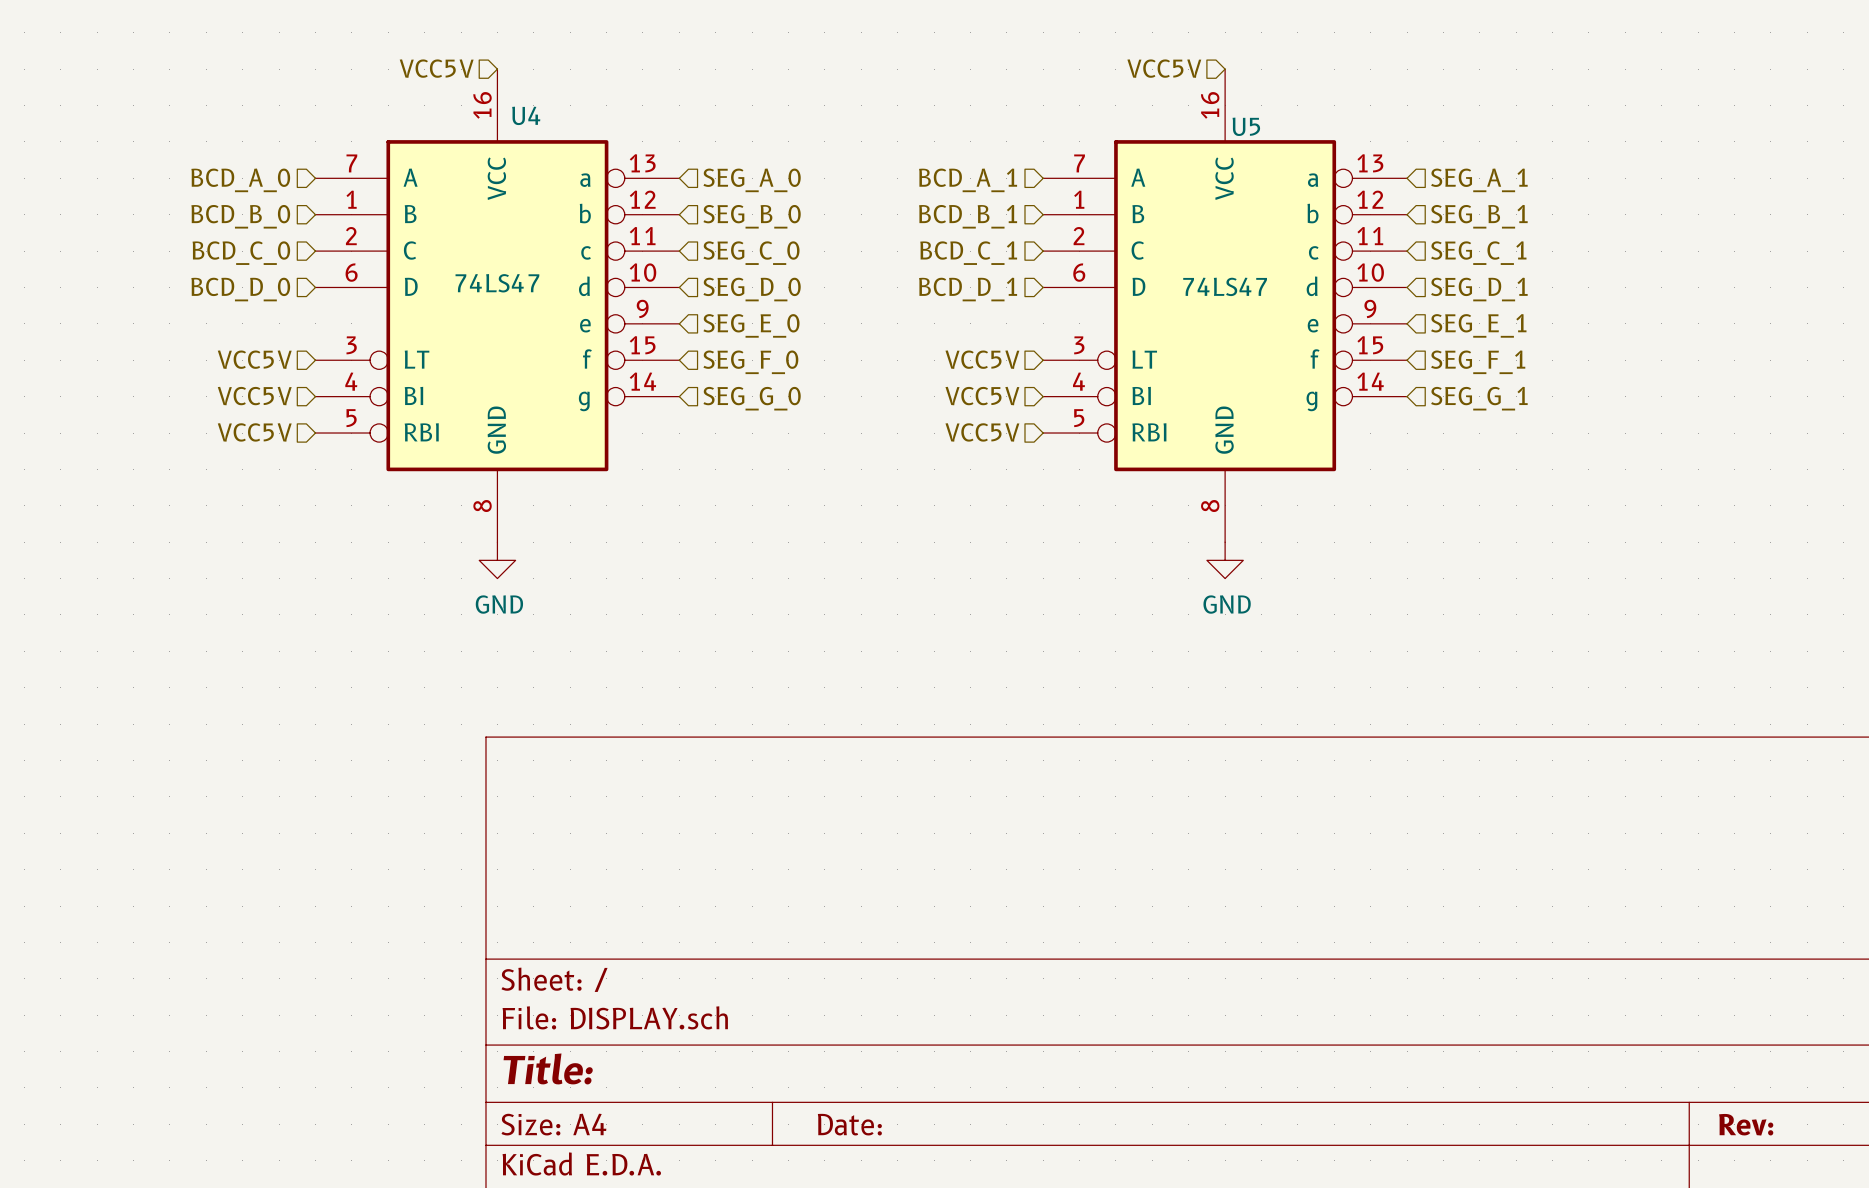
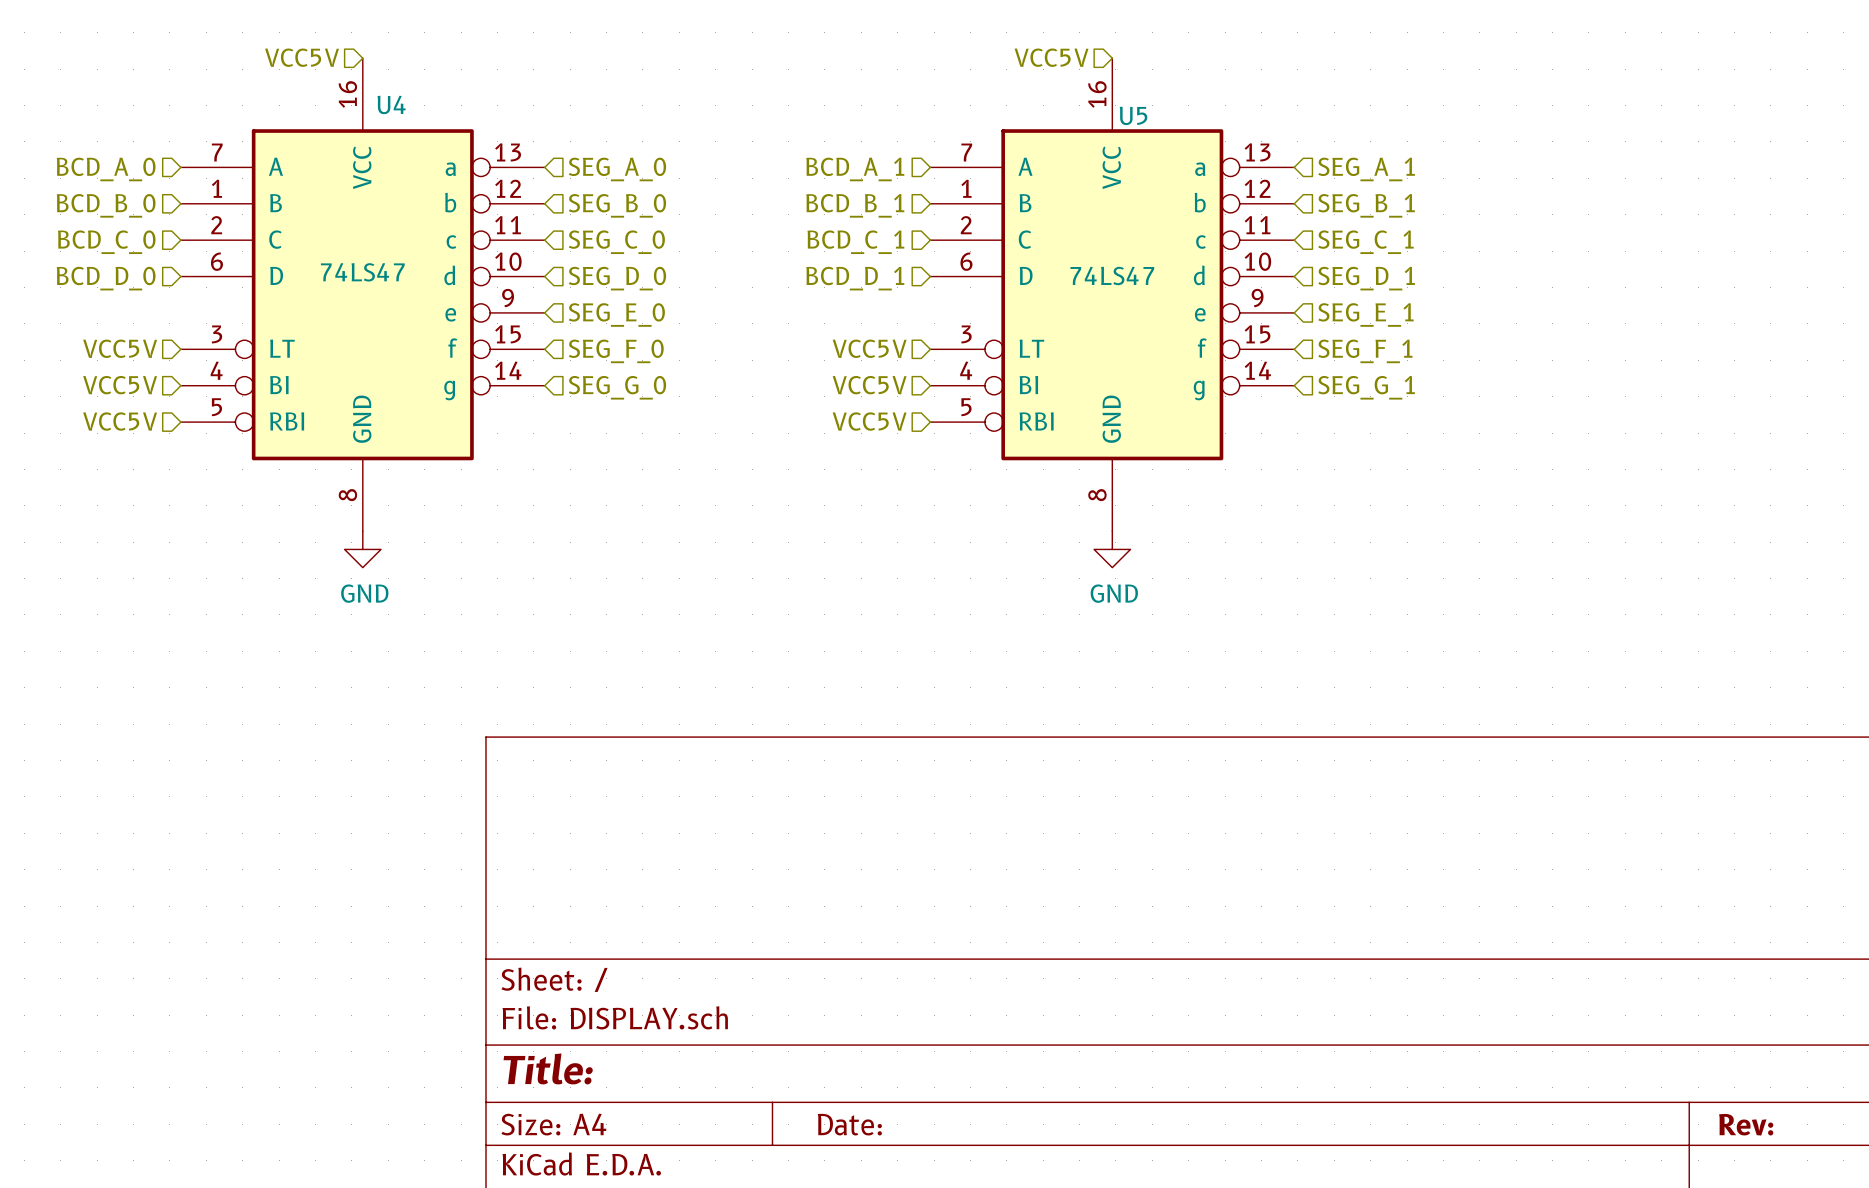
hierarchical label position: VCC5V (436, 68) -> VCC5V (302, 57)
hierarchical label position: VCC5V (1164, 68) -> VCC5V (1051, 57)
hierarchical label position: BCD_A_0 (240, 180) -> BCD_A_0 (106, 169)
hierarchical label position: SEG_A_0 (752, 180) -> SEG_A_0 (617, 169)
hierarchical label position: BCD_A_1 (968, 180) -> BCD_A_1 (855, 169)
hierarchical label position: SEG_A_1 (1479, 180) -> SEG_A_1 (1366, 169)
hierarchical label position: BCD_B_0 (240, 216) -> BCD_B_0 (106, 205)
hierarchical label position: SEG_B_0 (752, 216) -> SEG_B_0 (617, 205)
hierarchical label position: BCD_B_1 (968, 216) -> BCD_B_1 (855, 205)
hierarchical label position: SEG_B_1 (1479, 216) -> SEG_B_1 (1366, 205)
hierarchical label position: BCD_C_0 (241, 253) -> BCD_C_0 (106, 242)
hierarchical label position: SEG_C_0 (751, 253) -> SEG_C_0 (616, 242)
hierarchical label position: BCD_C_1 (968, 253) -> BCD_C_1 (855, 242)
hierarchical label position: SEG_C_1 (1478, 253) -> SEG_C_1 (1366, 242)
hierarchical label position: BCD_D_0 (240, 289) -> BCD_D_0 (106, 278)
hierarchical label position: SEG_D_0 (752, 289) -> SEG_D_0 (617, 278)
hierarchical label position: BCD_D_1 (968, 289) -> BCD_D_1 (855, 278)
hierarchical label position: SEG_D_1 (1479, 289) -> SEG_D_1 (1366, 278)
U4 position: (497, 305) -> (362, 294)
U5 position: (1225, 305) -> (1112, 294)
hierarchical label position: SEG_E_0 (751, 325) -> SEG_E_0 (616, 315)
hierarchical label position: SEG_E_1 (1478, 325) -> SEG_E_1 (1366, 314)
hierarchical label: none -> VCC5V (120, 348)
hierarchical label: none -> VCC5V (869, 348)
hierarchical label: VCC5V (254, 359) -> none
hierarchical label: VCC5V (982, 359) -> none
hierarchical label position: SEG_F_0 (750, 362) -> SEG_F_0 (616, 351)
hierarchical label position: SEG_F_1 (1478, 362) -> SEG_F_1 (1365, 351)
hierarchical label: none -> VCC5V (120, 385)
hierarchical label: none -> VCC5V (869, 385)
hierarchical label: VCC5V (254, 396) -> none
hierarchical label: VCC5V (982, 396) -> none
hierarchical label position: SEG_G_0 (752, 398) -> SEG_G_0 (617, 387)
hierarchical label position: SEG_G_1 (1479, 398) -> SEG_G_1 (1366, 387)
hierarchical label: none -> VCC5V (120, 421)
hierarchical label: none -> VCC5V (869, 421)
hierarchical label: VCC5V (254, 432) -> none
hierarchical label: VCC5V (982, 432) -> none
power symbol position: GND (497, 560) -> GND (362, 549)
power symbol position: GND (1225, 560) -> GND (1112, 549)

